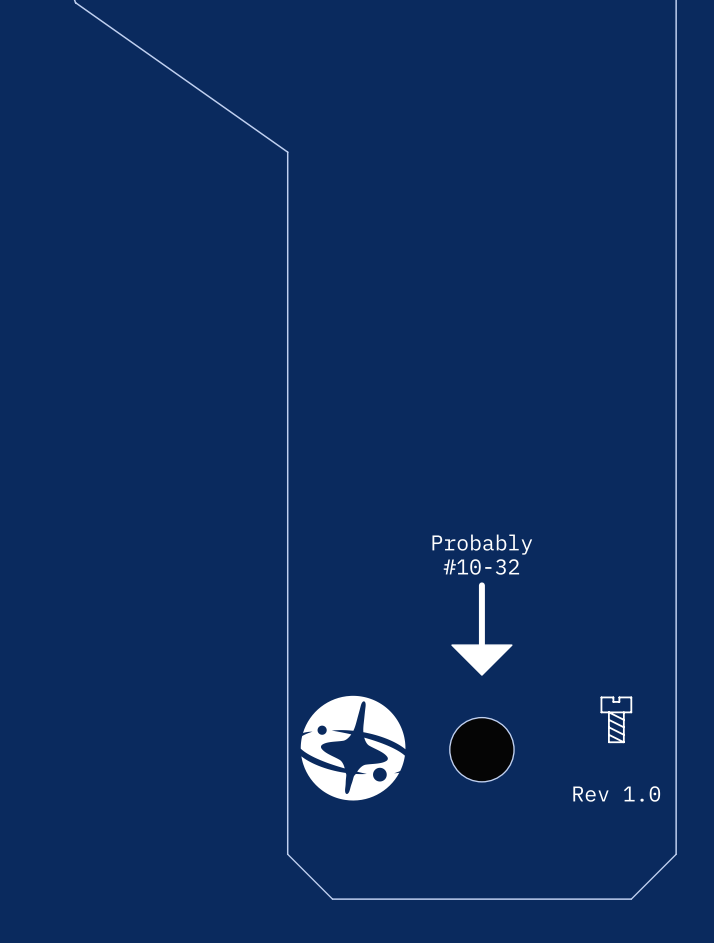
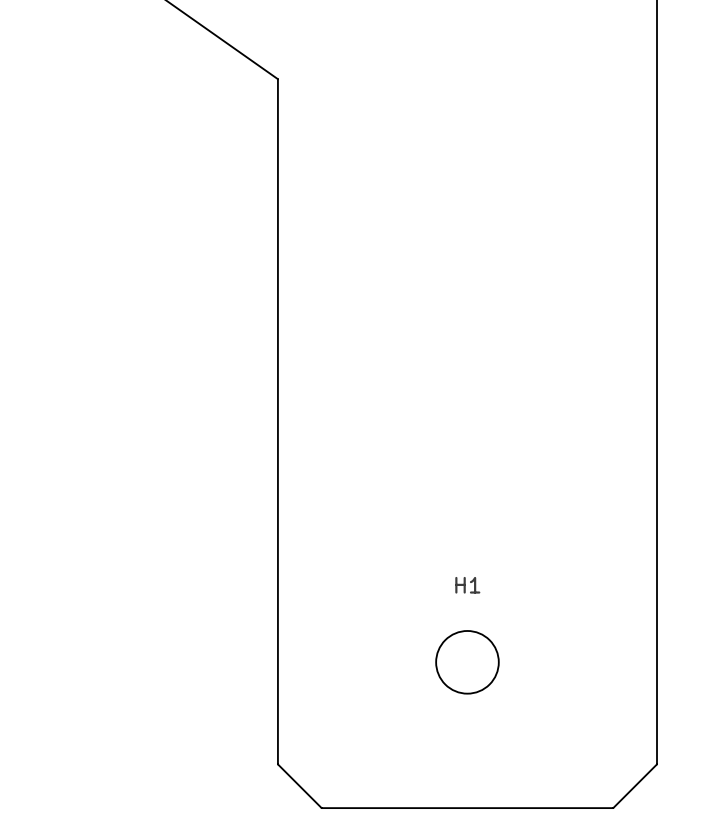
text: Probably (482, 544) -> none
text: #10-32 (481, 566) -> none
line: (481, 585) (481, 660) -> none
drawing: [451, 644, 513, 676] -> none
H1 name: none -> H1 (467, 585)
drawing: [300, 695, 406, 801] -> none
drawing: [600, 696, 633, 744] -> none
text: Rev 1.0 (616, 793) -> none

